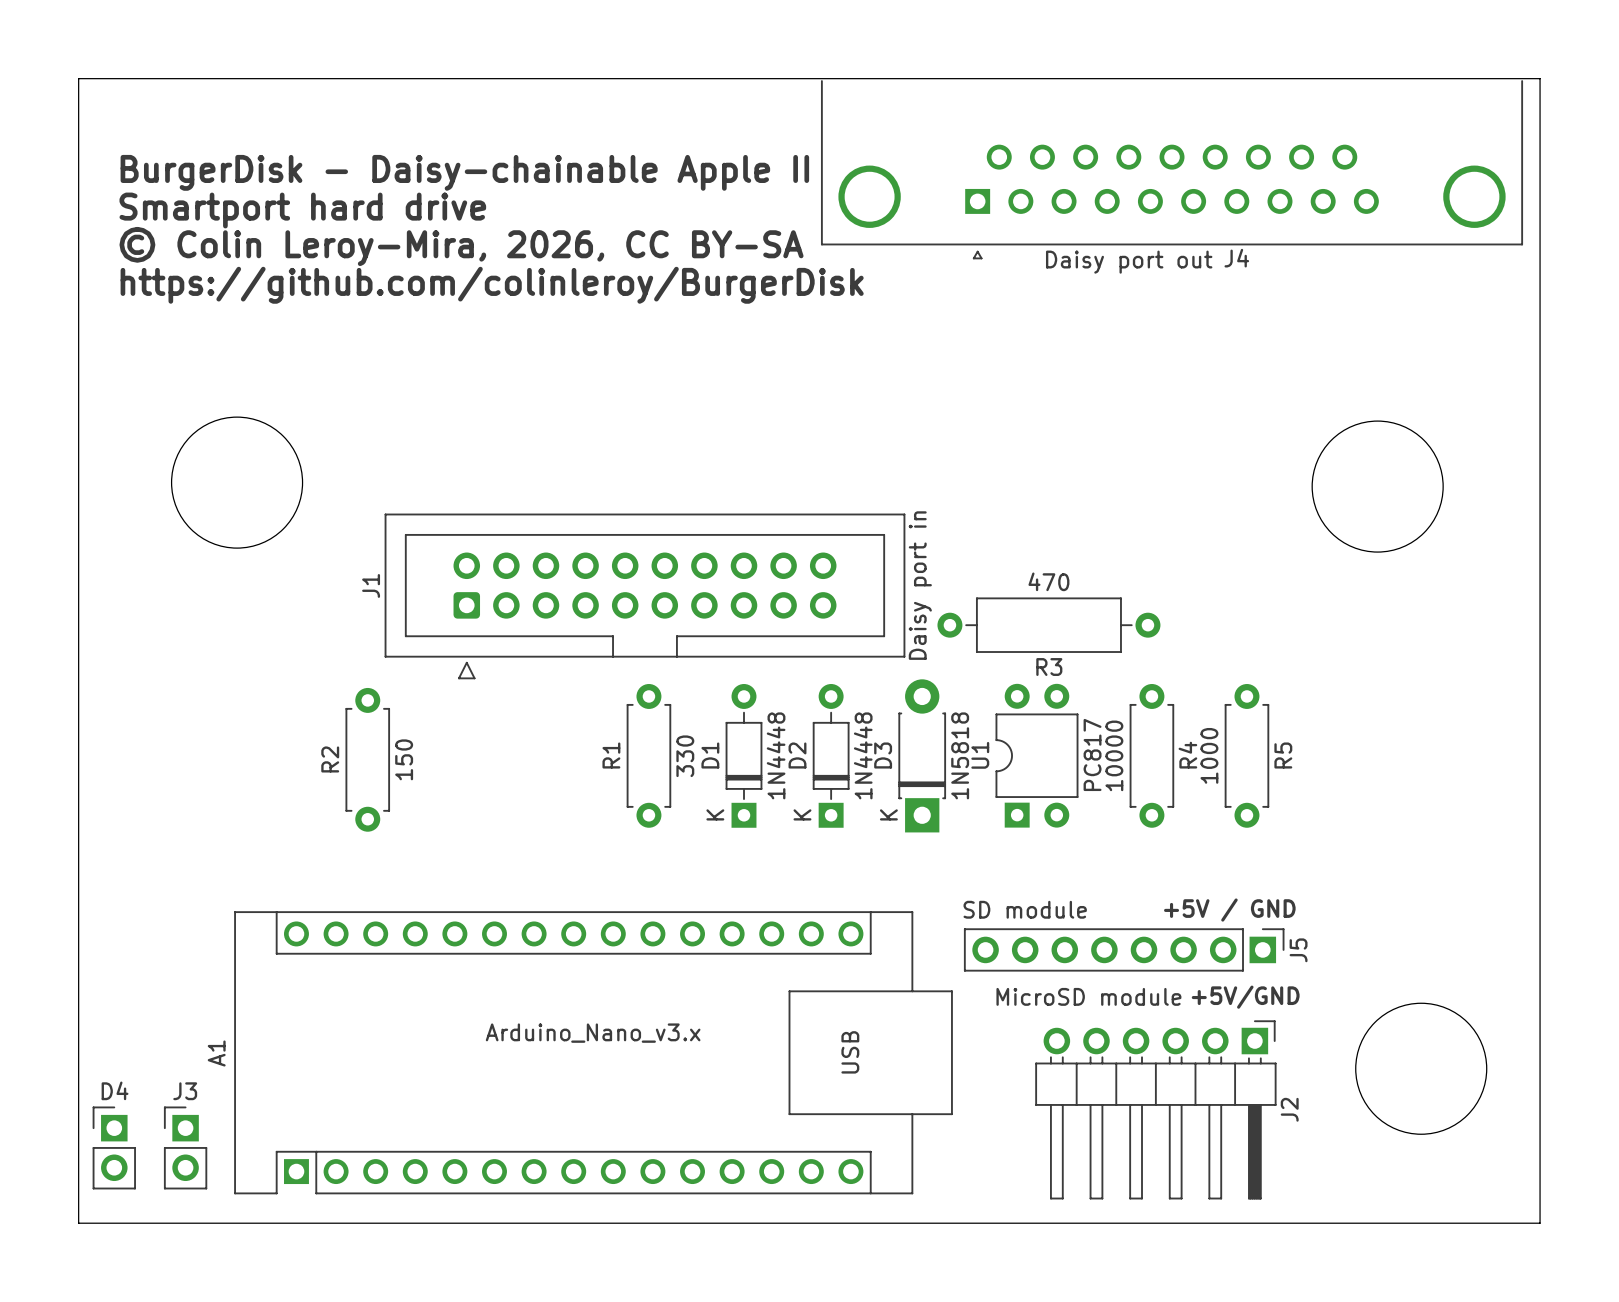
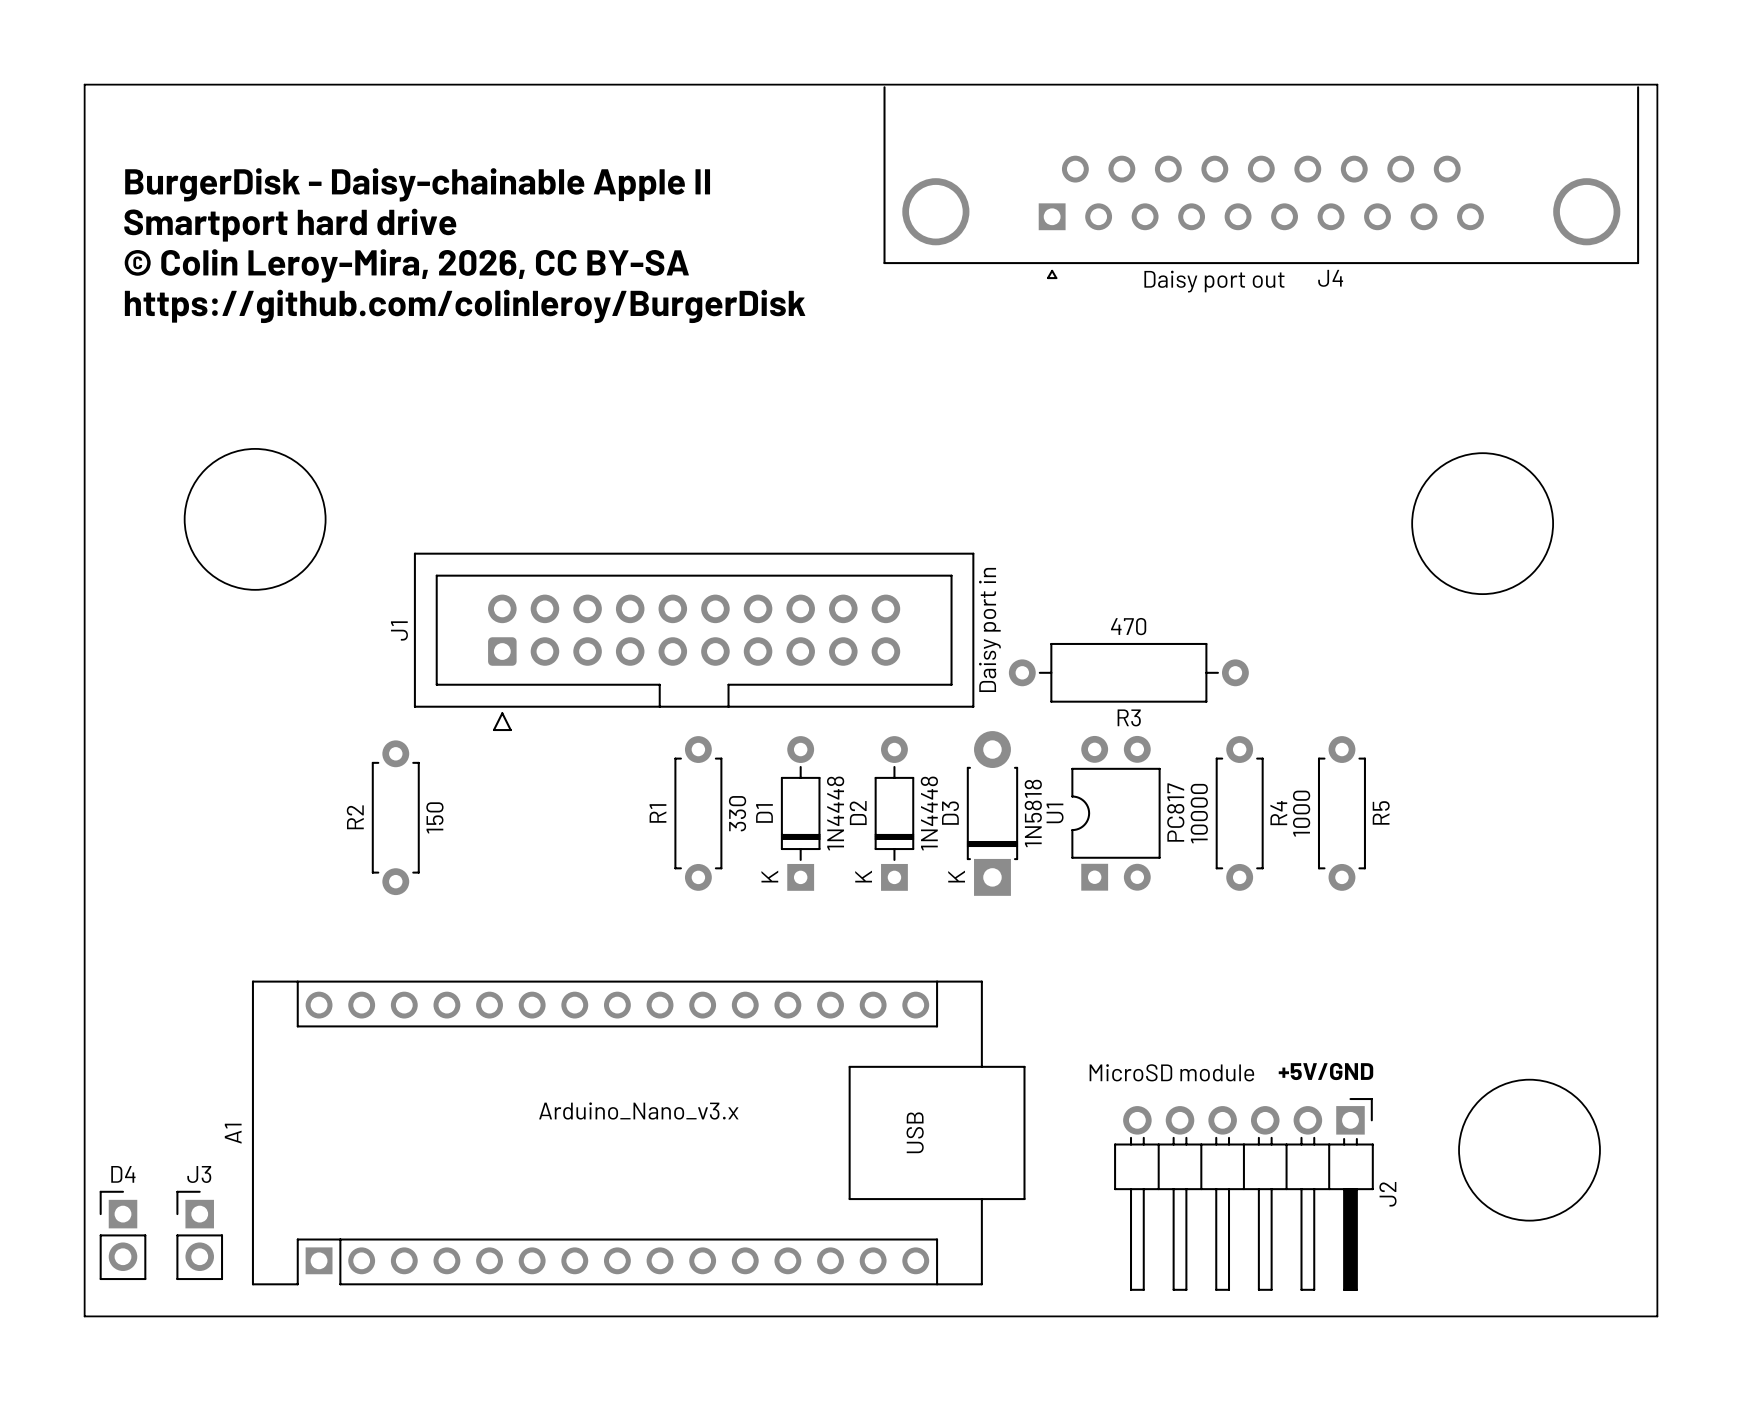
text: +5V / GND (1229, 910) -> none
J5: SD module (1124, 949) -> none

